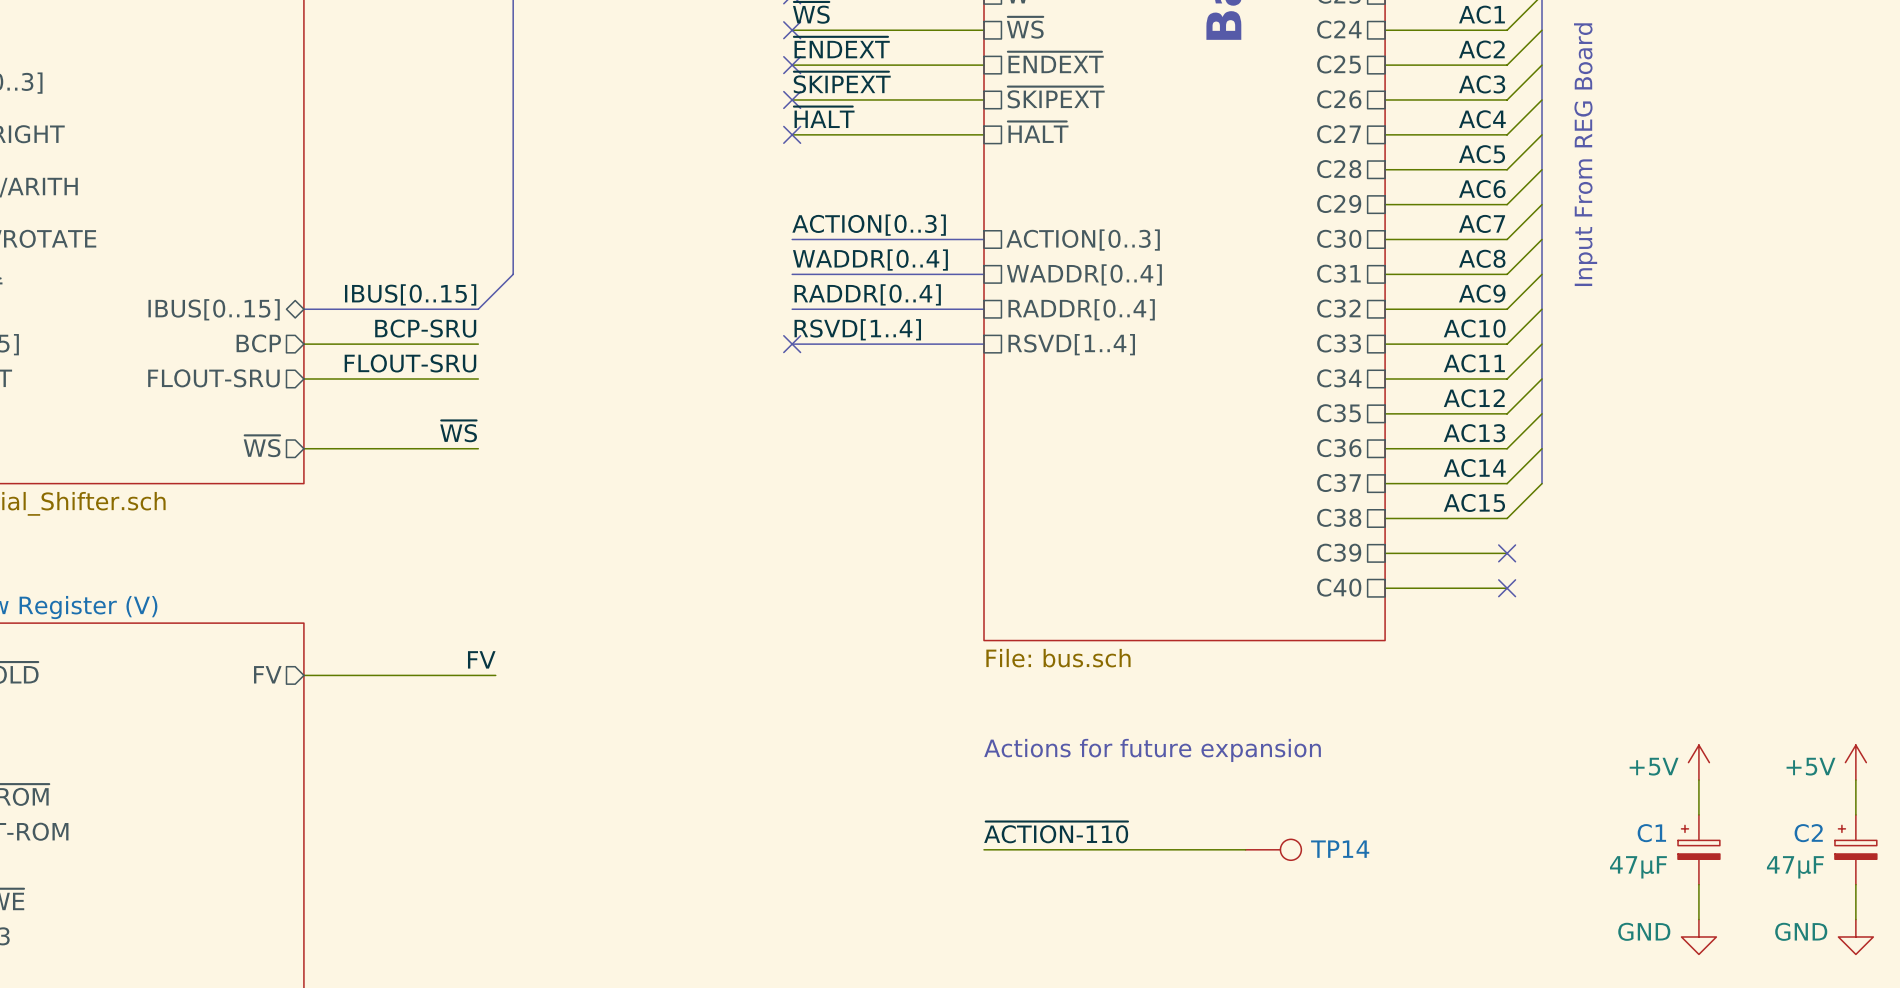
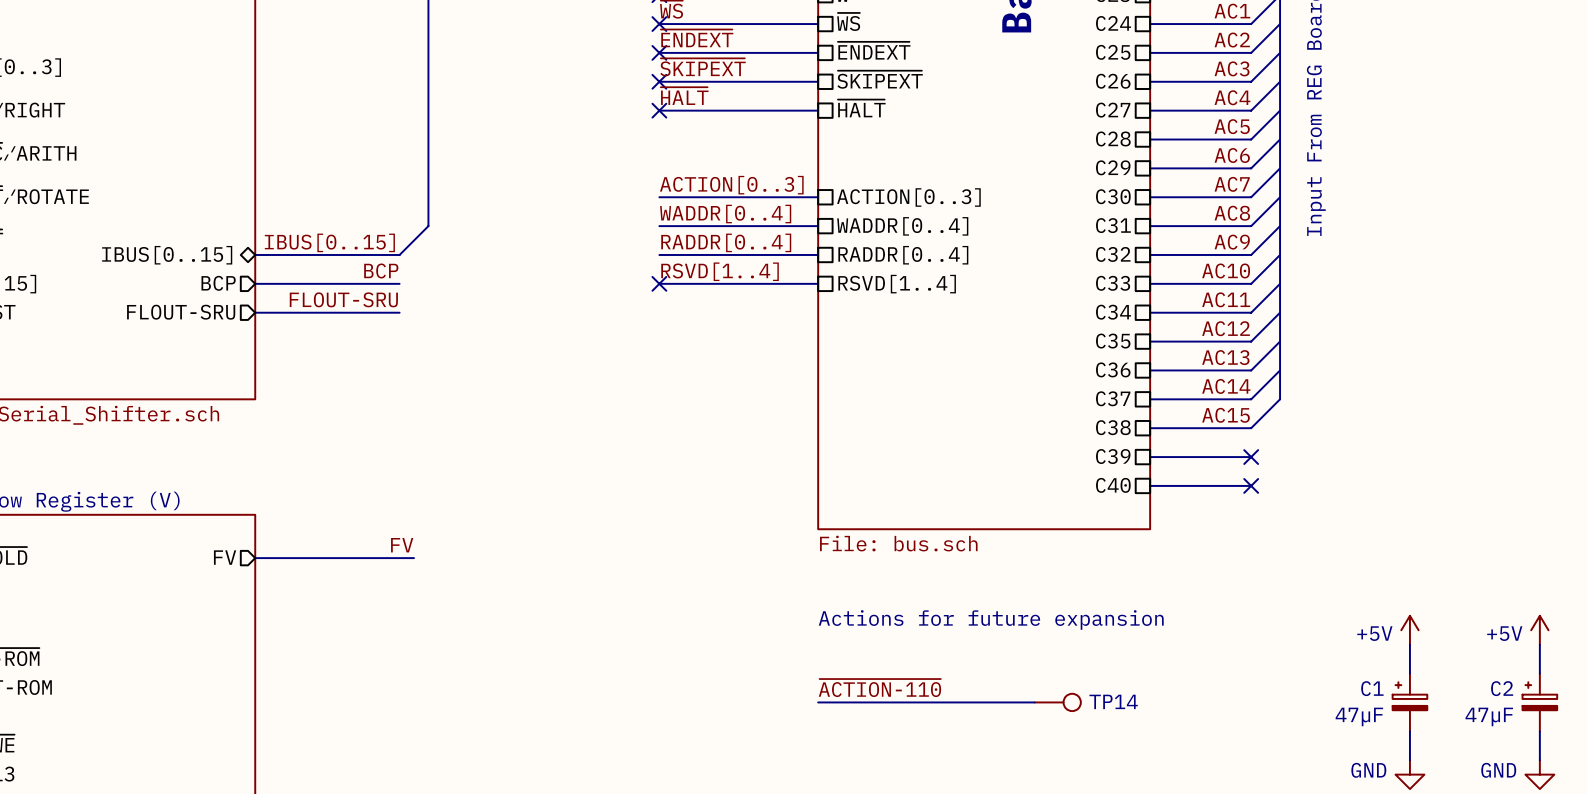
label: BCP-SRU (425, 328) -> BCP (381, 270)
label: ~{WS} (458, 431) -> none
sheet pin: ~{WS} (262, 446) -> none
wire: (303, 448) (478, 448) -> none

